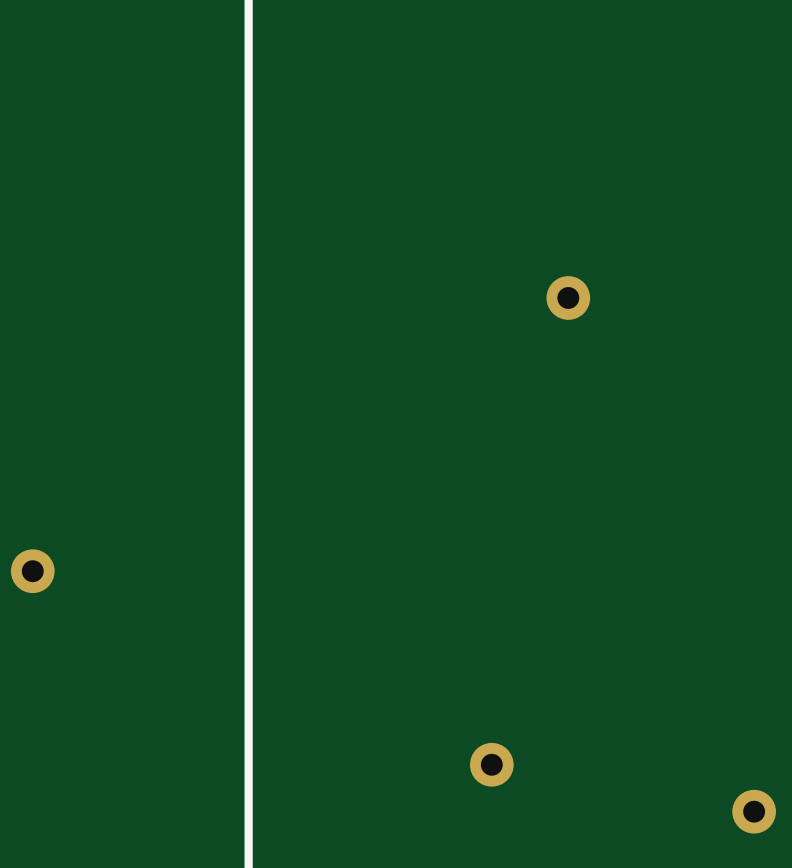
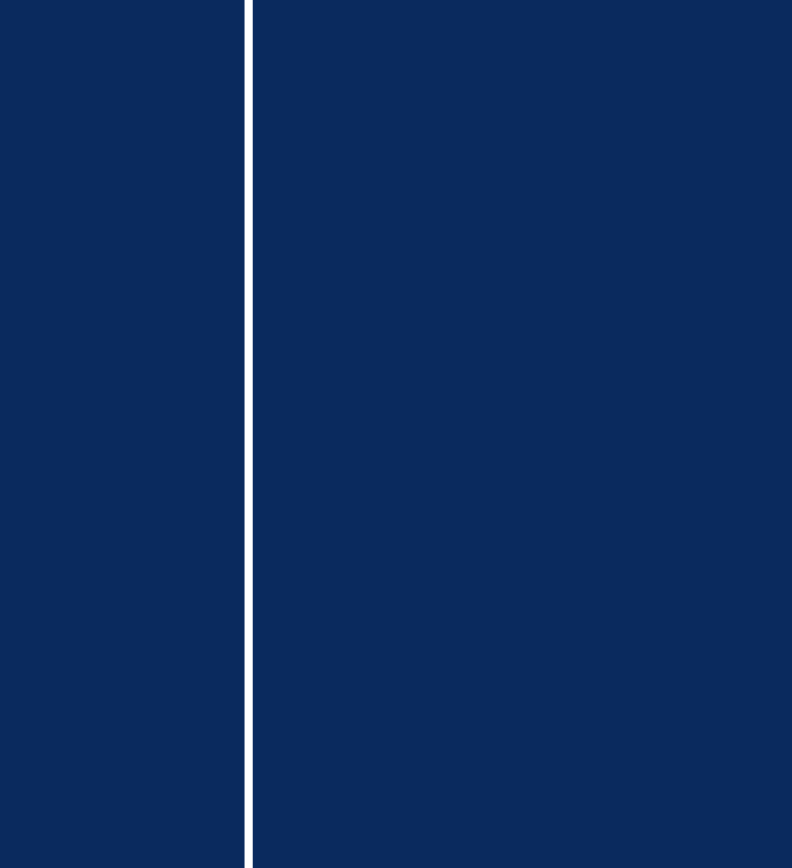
via: (568, 297) -> none
via: (32, 571) -> none
via: (491, 764) -> none
via: (754, 811) -> none

